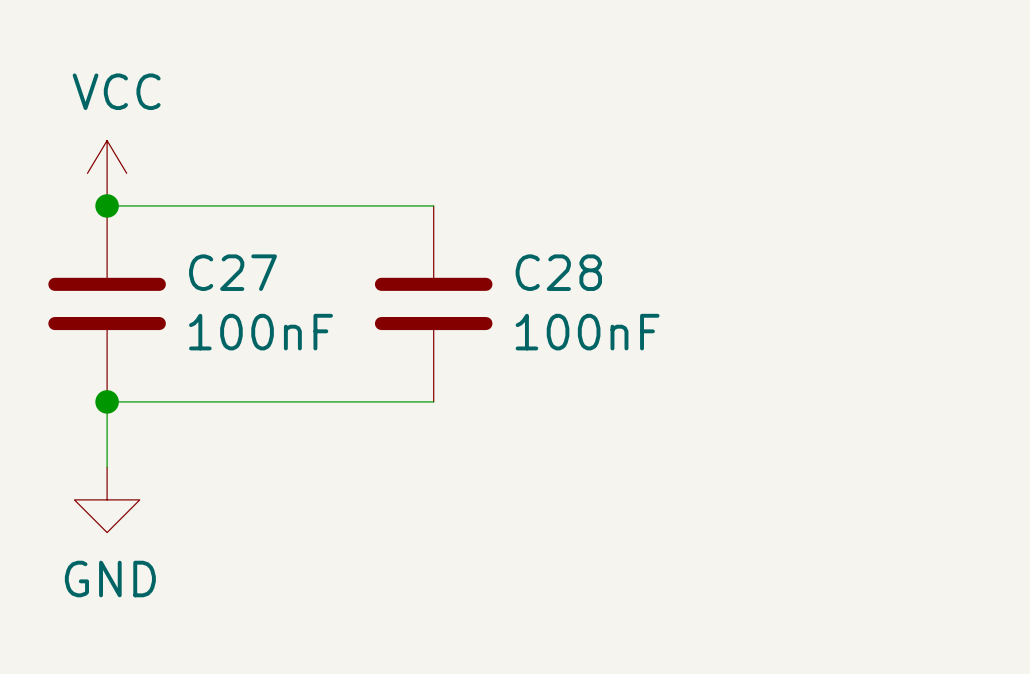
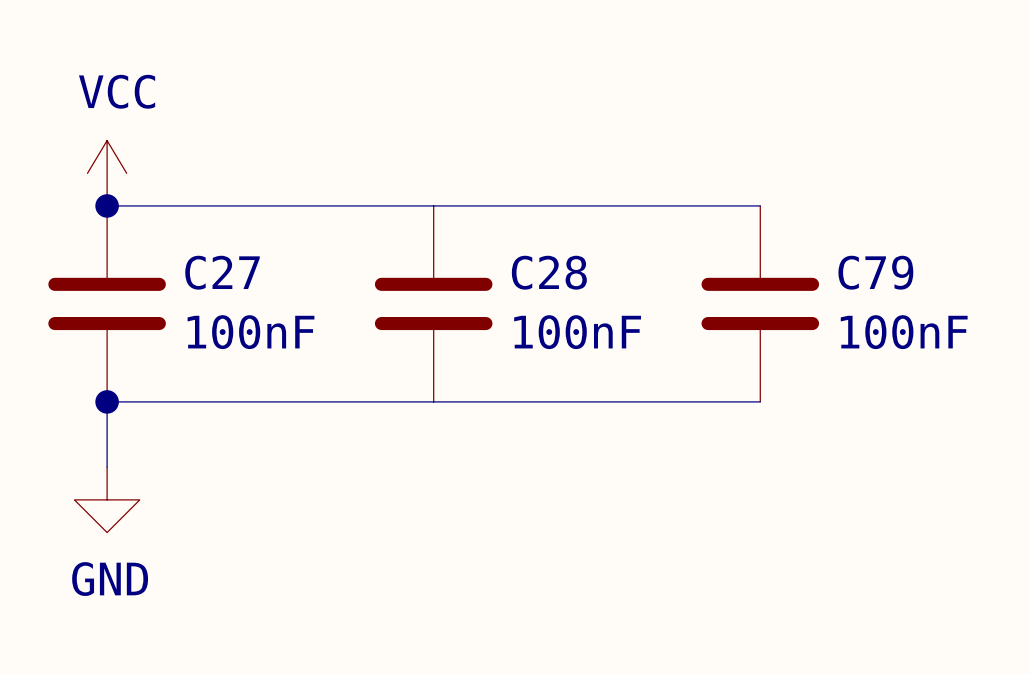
wire: none -> (433, 205) (760, 205)
C79: none -> 100nF (760, 303)
wire: none -> (433, 401) (760, 401)

